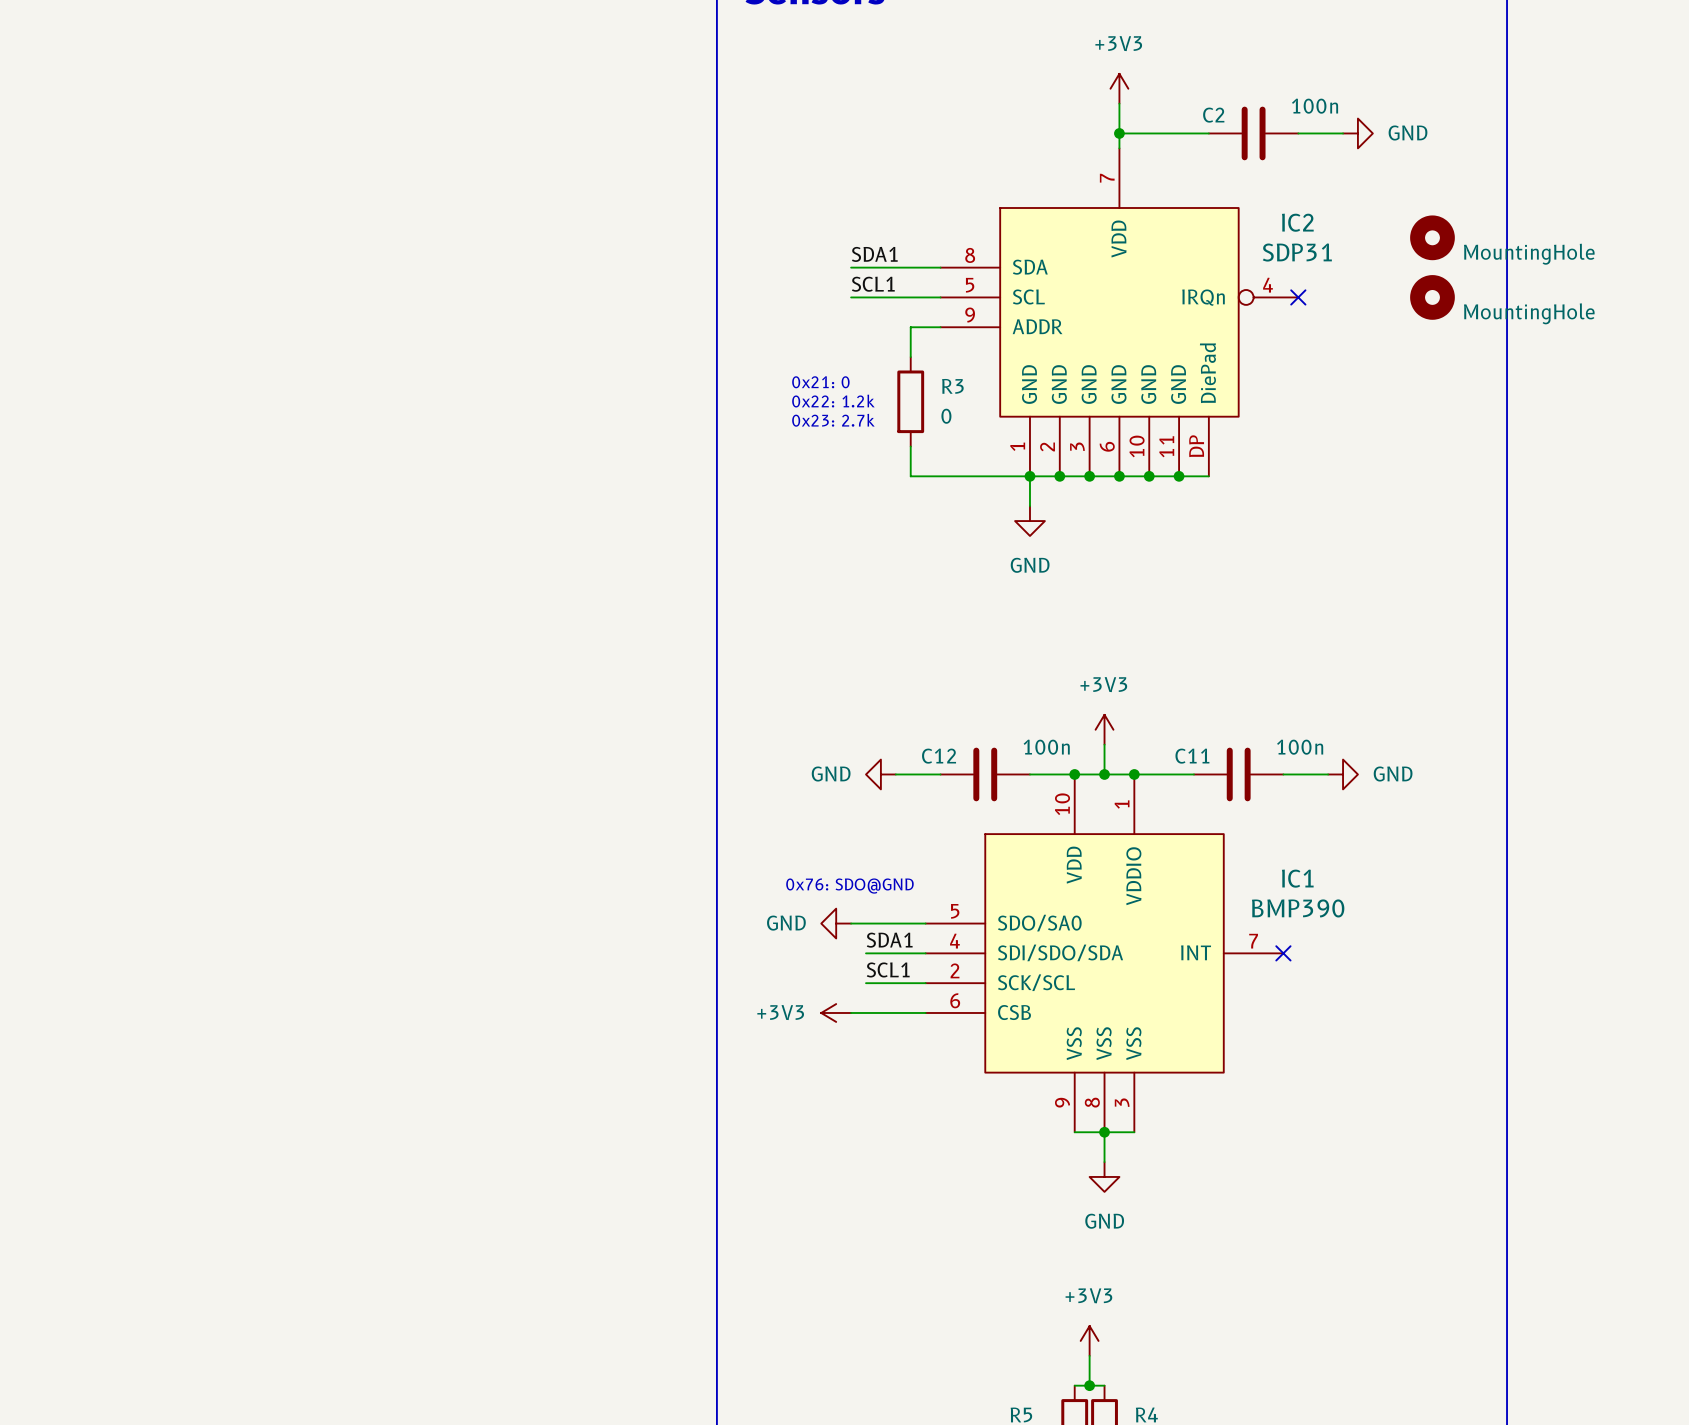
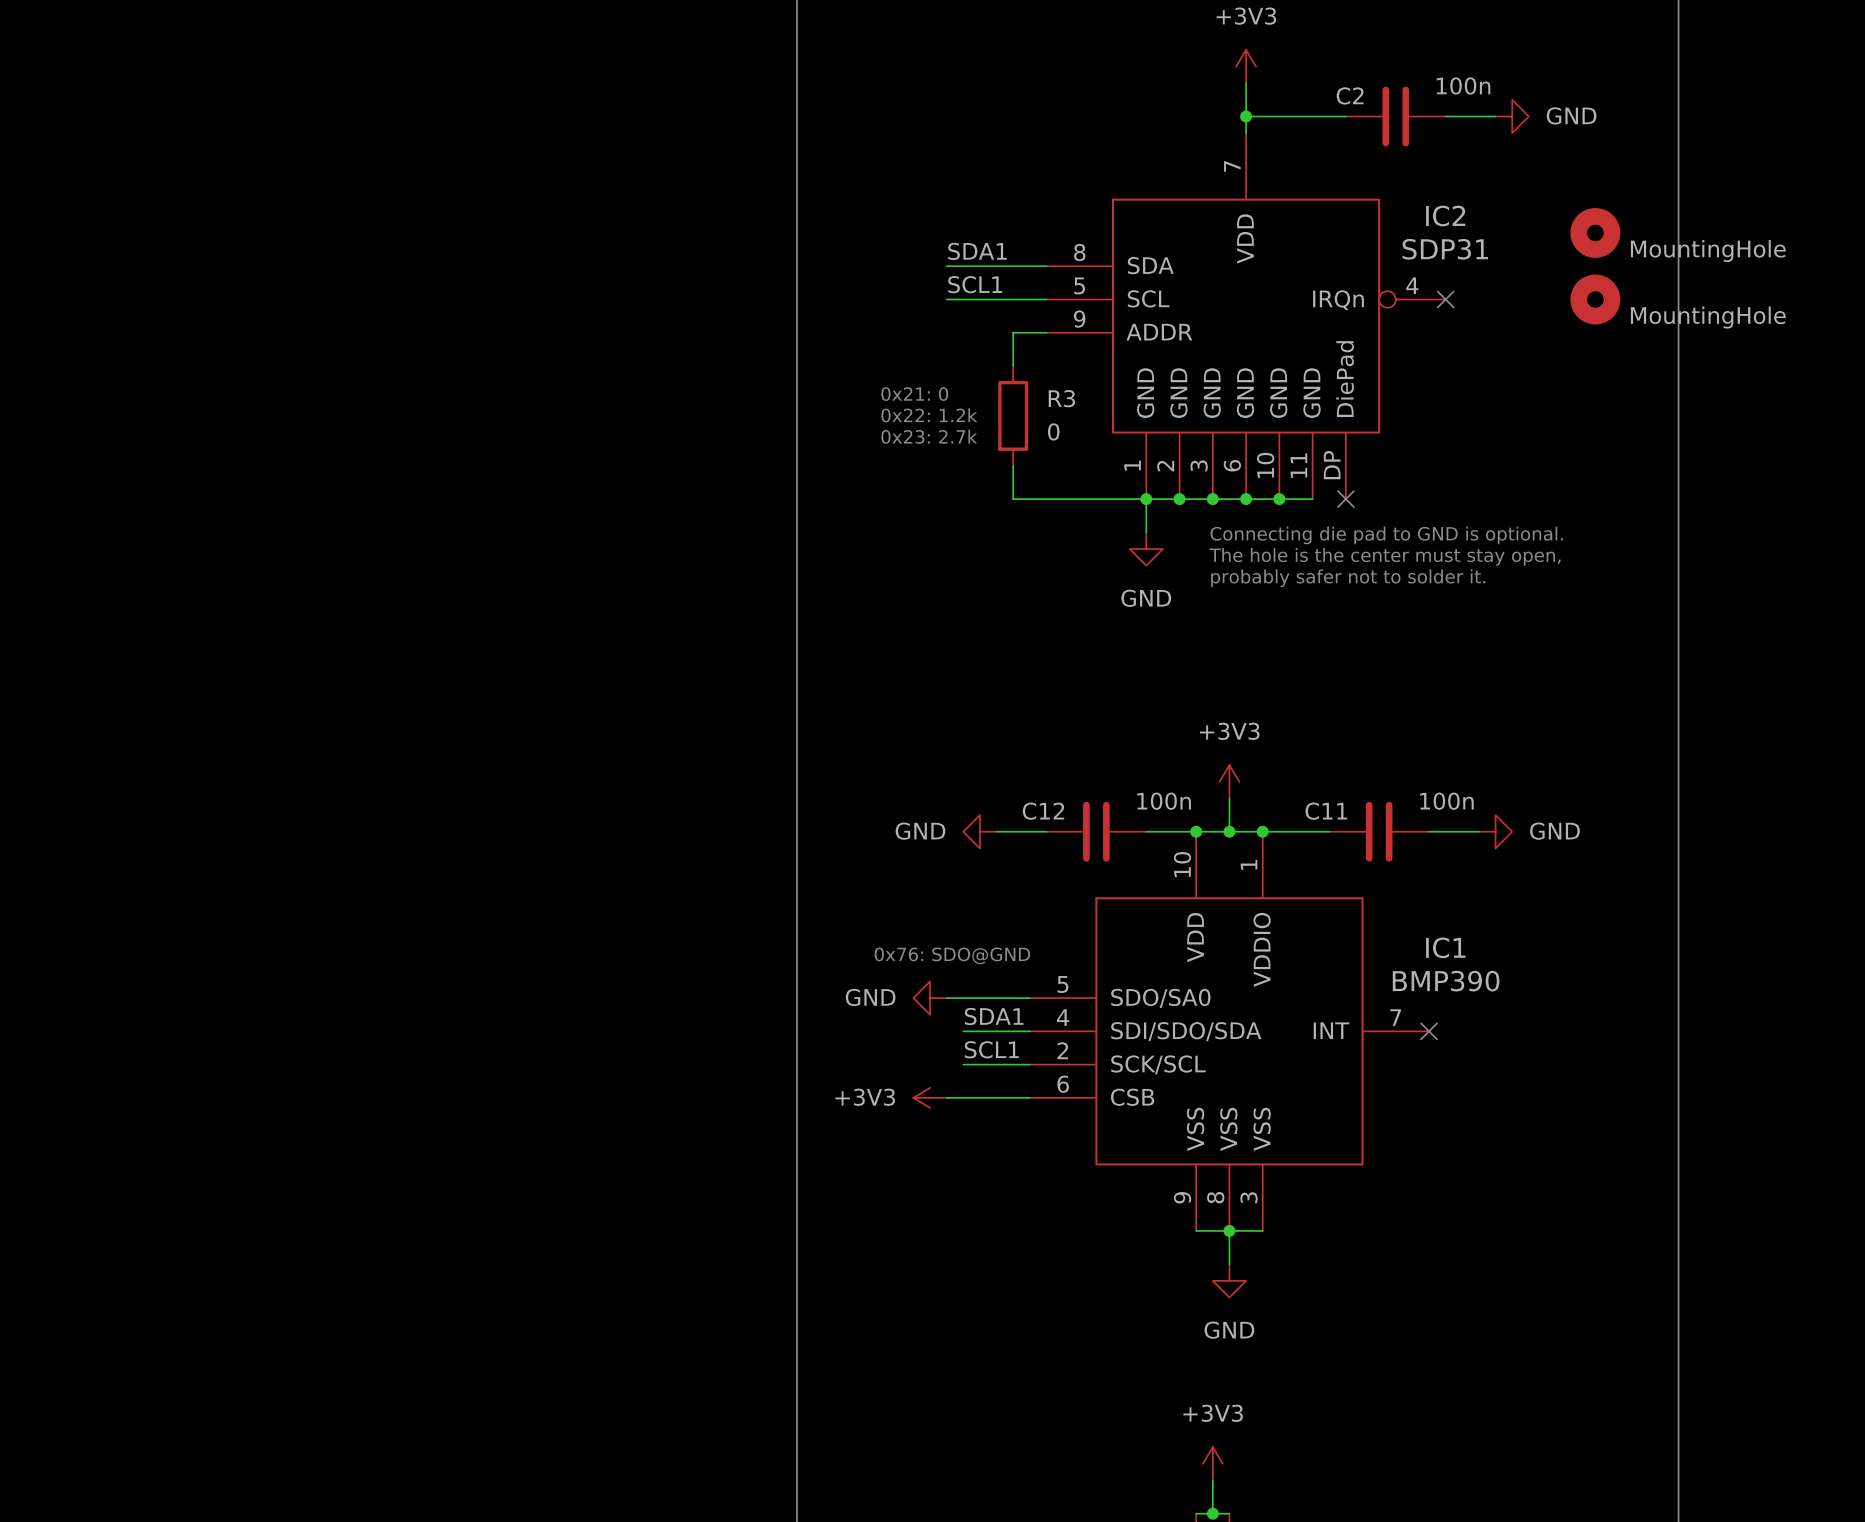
wire: (1179, 476) (1208, 476) -> none
junction: (1179, 476) -> none
no-connect mark: none -> (1345, 499)
text: none -> Connecting die pad to GND is optional. (1386, 535)
text: none -> The hole is the center must stay open, (1385, 556)
text: none -> probably safer not to solder it. (1348, 578)

